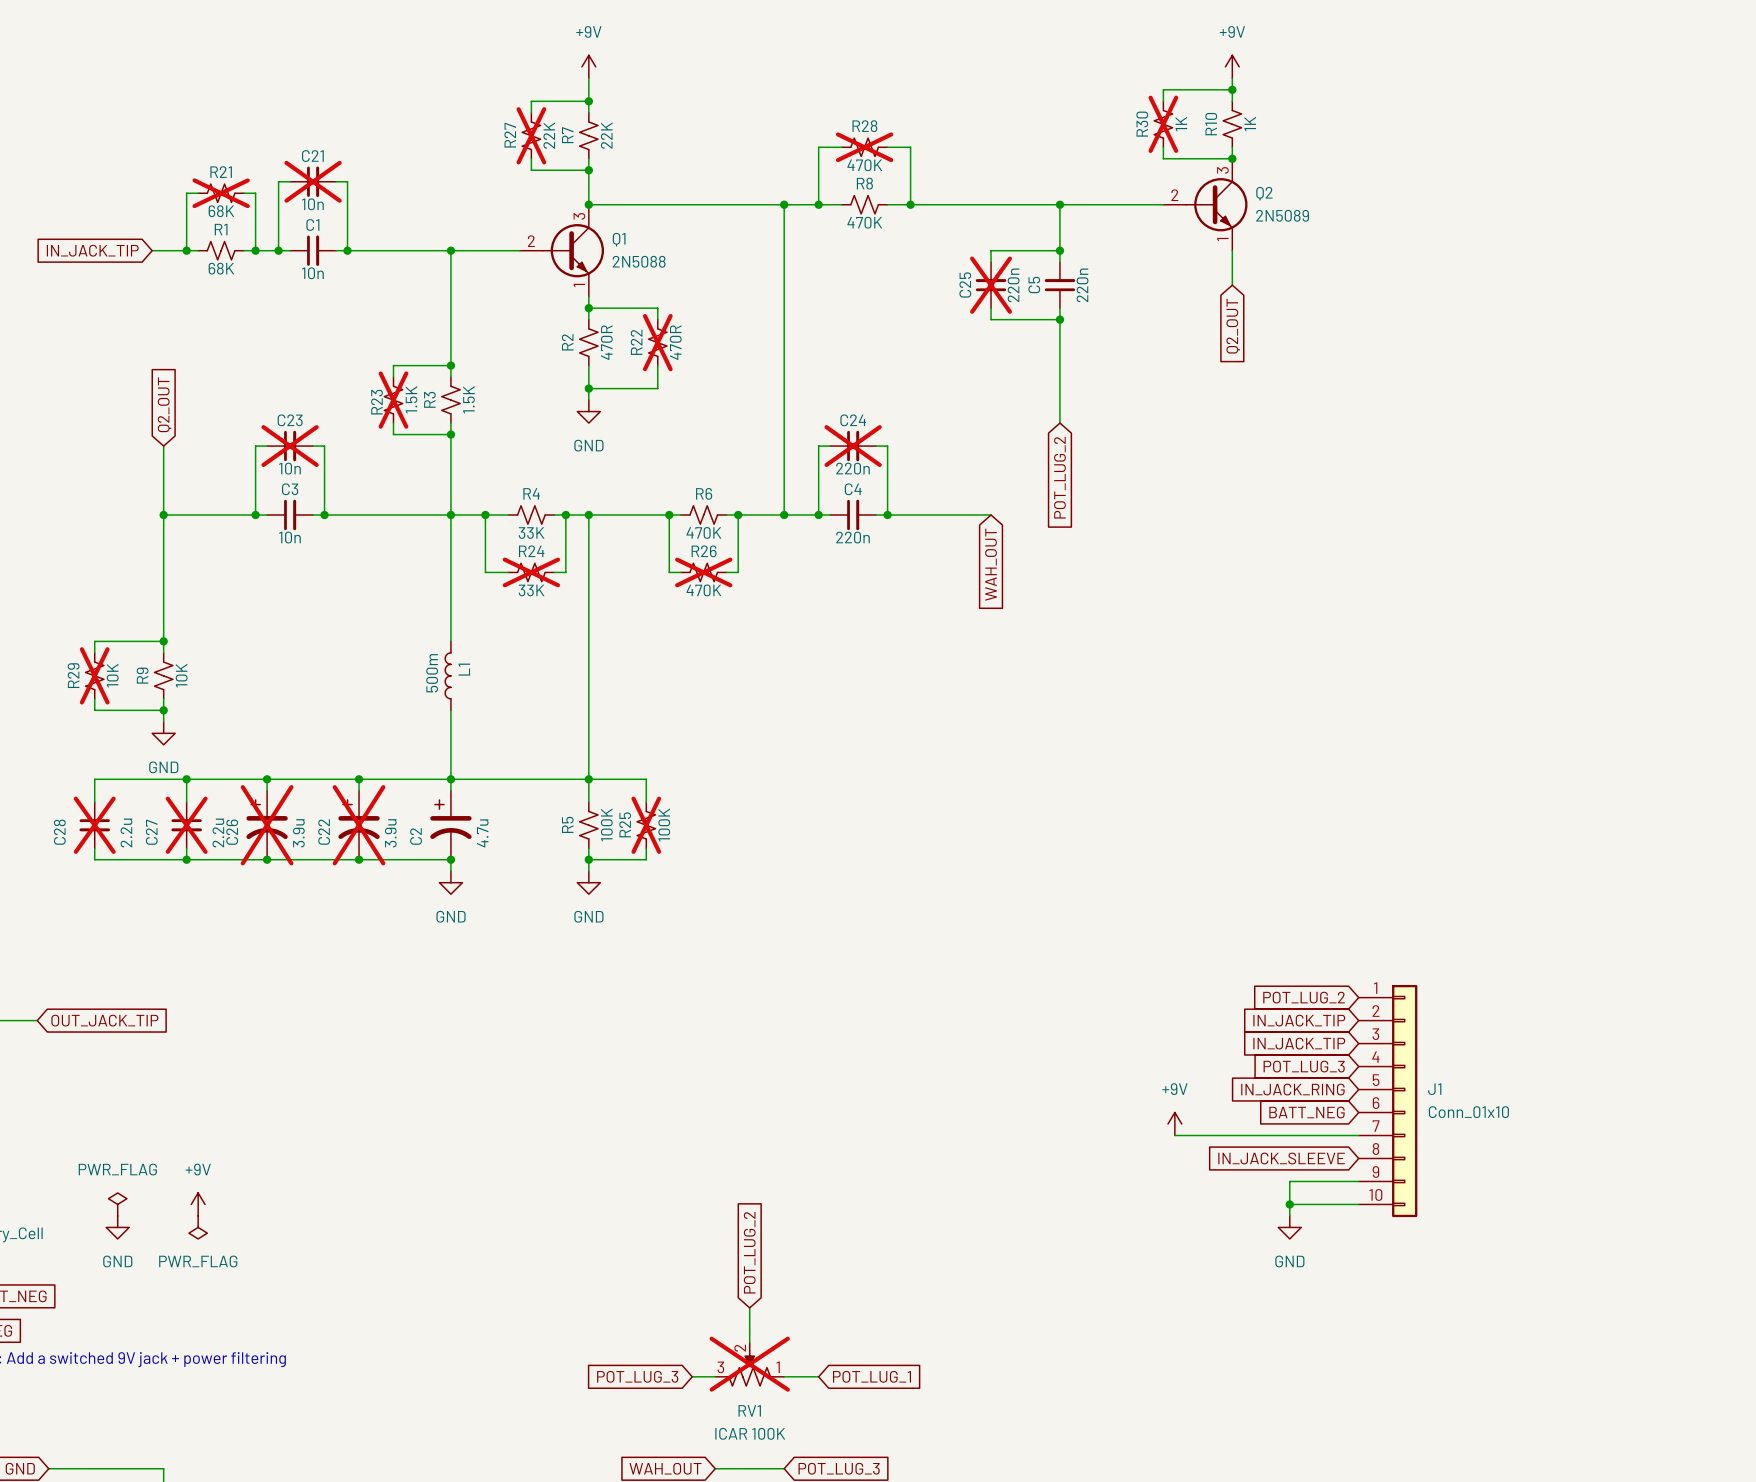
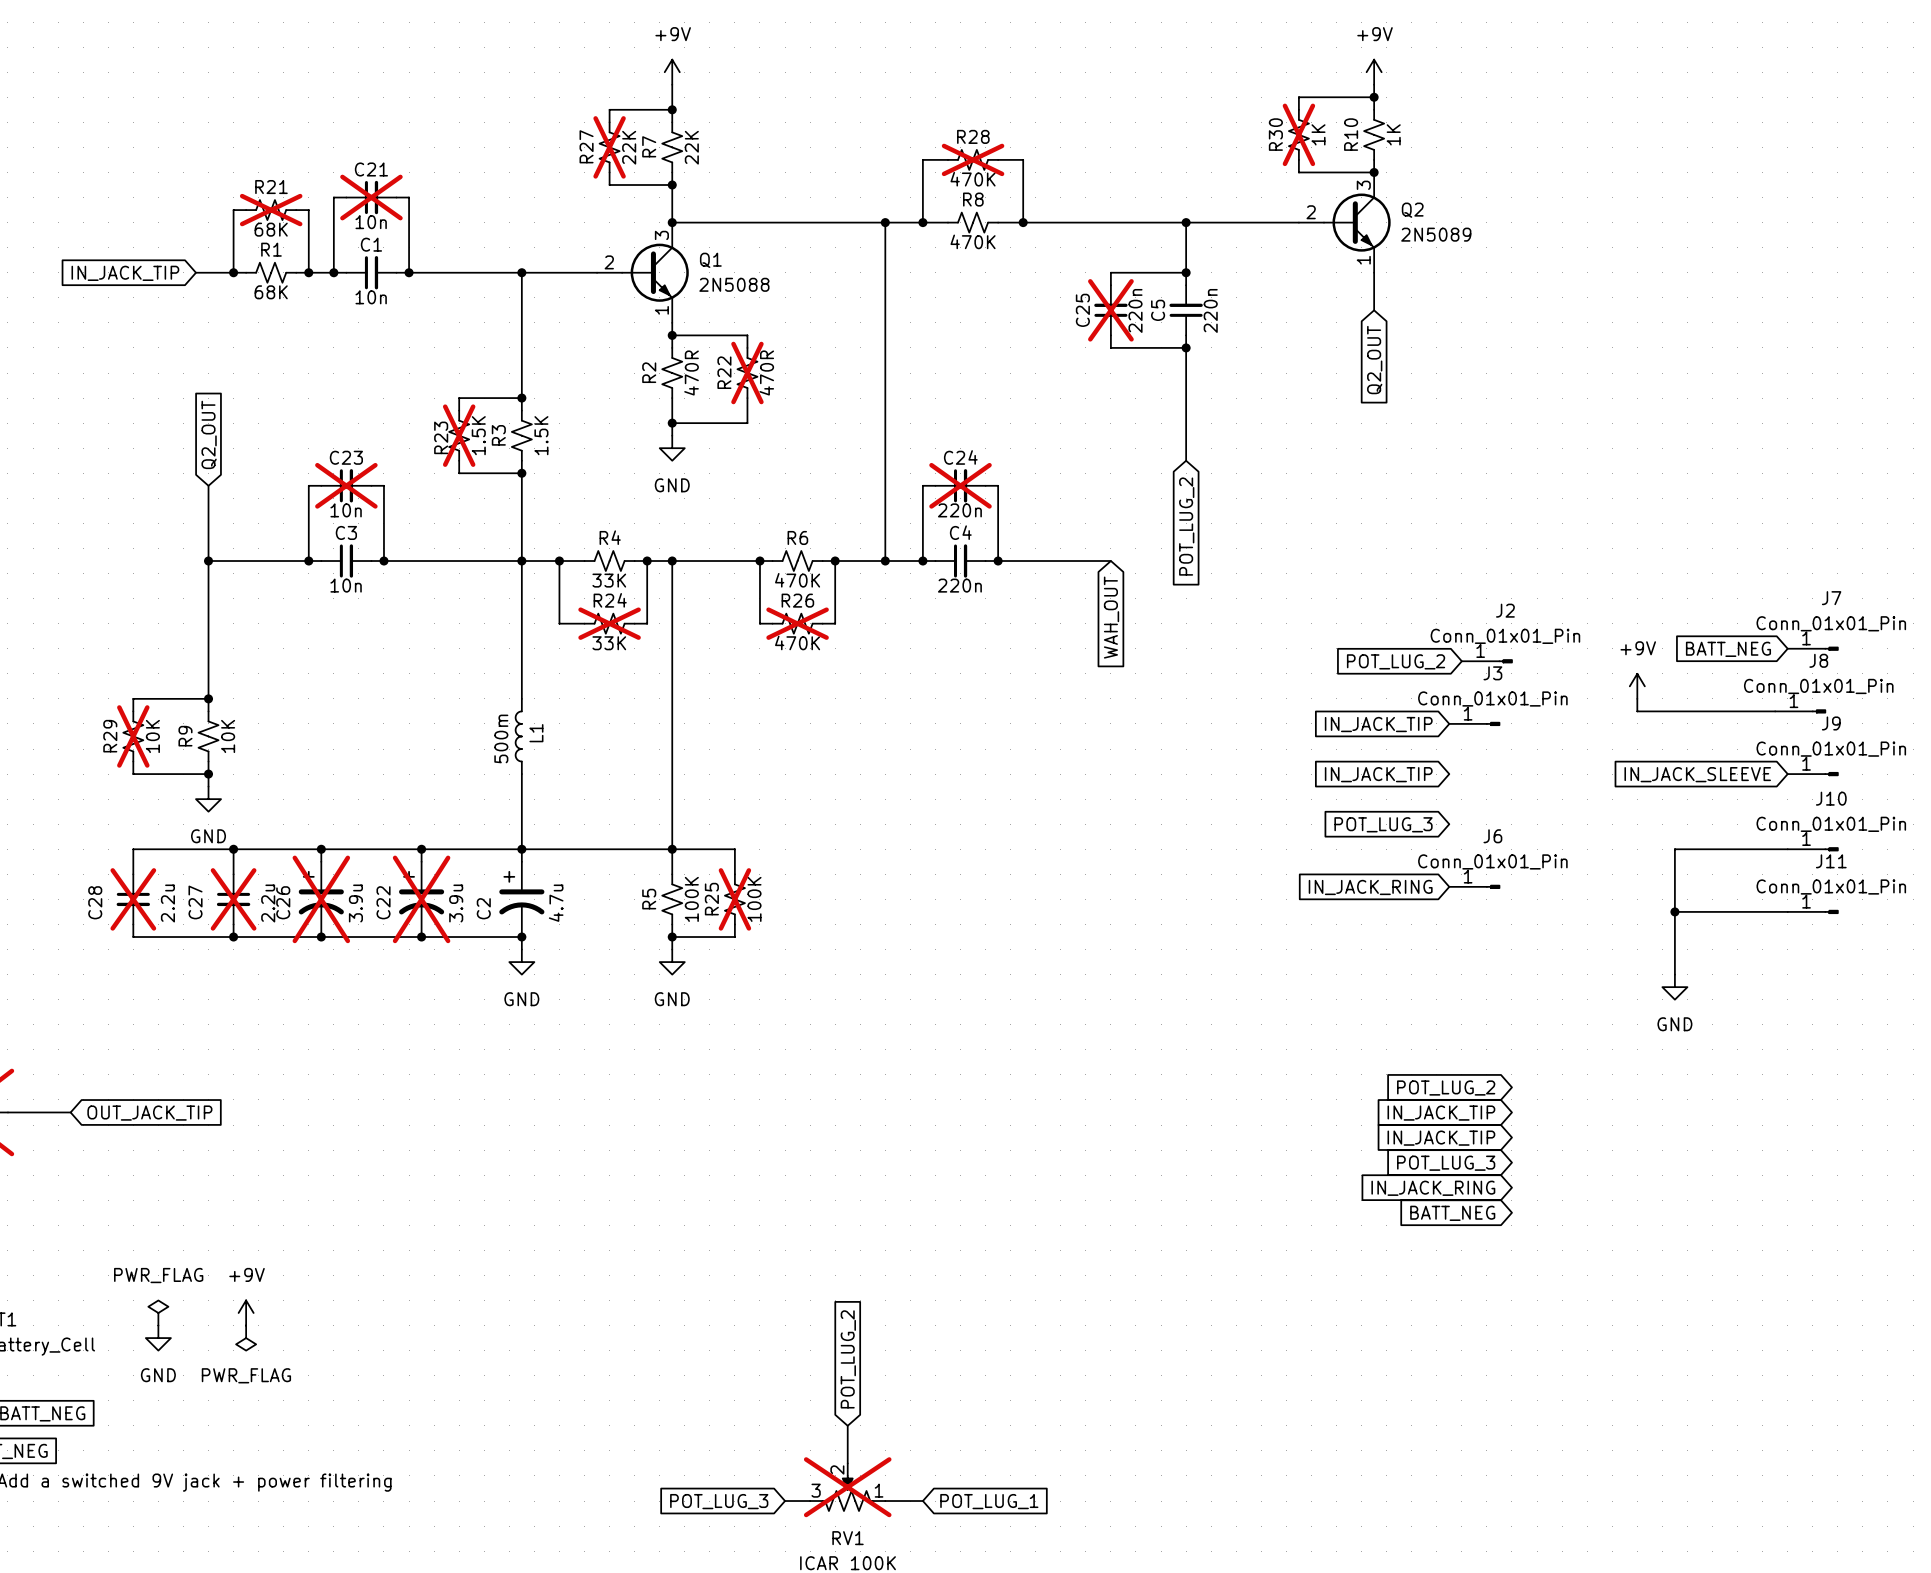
global label: none -> BATT_NEG (1728, 649)
J7: none -> Conn_01x01_Pin (1813, 648)
global label: none -> POT_LUG_2 (1396, 661)
J2: none -> Conn_01x01_Pin (1487, 661)
power symbol: none -> +9V (1637, 686)
wire: none -> (1637, 698) (1637, 711) (1775, 711)
J8: none -> Conn_01x01_Pin (1800, 711)
global label: none -> IN_JACK_TIP (1378, 724)
J3: none -> Conn_01x01_Pin (1474, 723)
global label: none -> IN_JACK_TIP (1378, 774)
global label: none -> IN_JACK_SLEEVE (1697, 774)
J9: none -> Conn_01x01_Pin (1813, 774)
global label: none -> POT_LUG_3 (1383, 824)
wire: none -> (1787, 849) (1674, 849) (1674, 974)
J10: none -> Conn_01x01_Pin (1813, 849)
global label: none -> IN_JACK_RING (1370, 887)
J6: none -> Conn_01x01_Pin (1474, 886)
wire: none -> (1674, 911) (1787, 911)
junction: none -> (1674, 911)
J11: none -> Conn_01x01_Pin (1813, 911)
power symbol: none -> GND (1674, 987)
J1: Conn_01x10 (1388, 1101) -> none
power symbol: +9V (1174, 1124) -> none
wire: (1174, 1135) (1358, 1135) -> none
global label: IN_JACK_SLEEVE (1281, 1158) -> none
wire: (1358, 1181) (1289, 1181) (1289, 1215) -> none
wire: (1289, 1204) (1358, 1204) -> none
junction: (1289, 1204) -> none
power symbol: GND (1289, 1227) -> none

